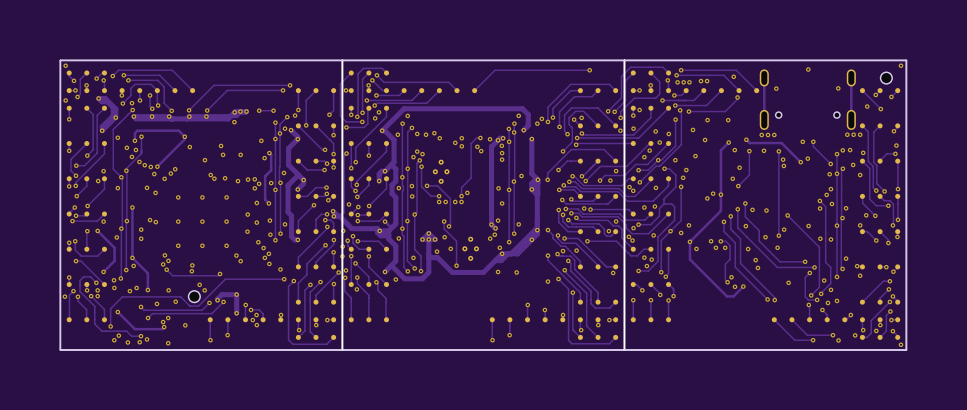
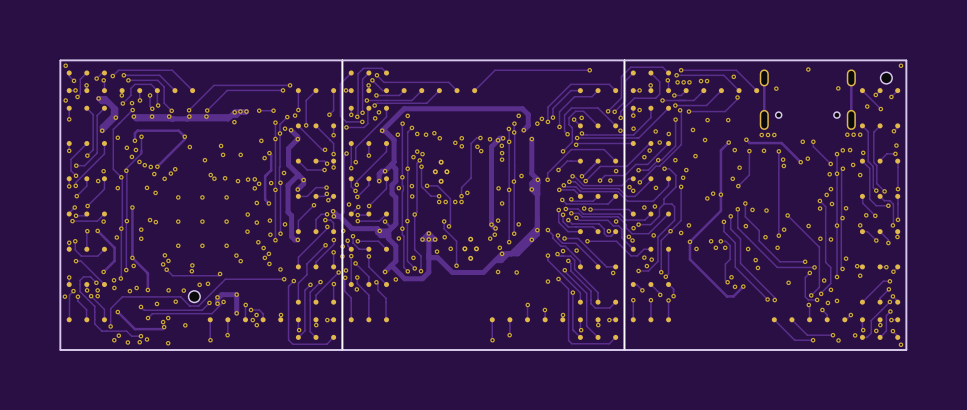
via: none -> (207, 283)
via: none -> (183, 290)
via: (204, 290) -> none
via: none -> (217, 297)
via: (217, 300) -> none
via: none -> (217, 303)

